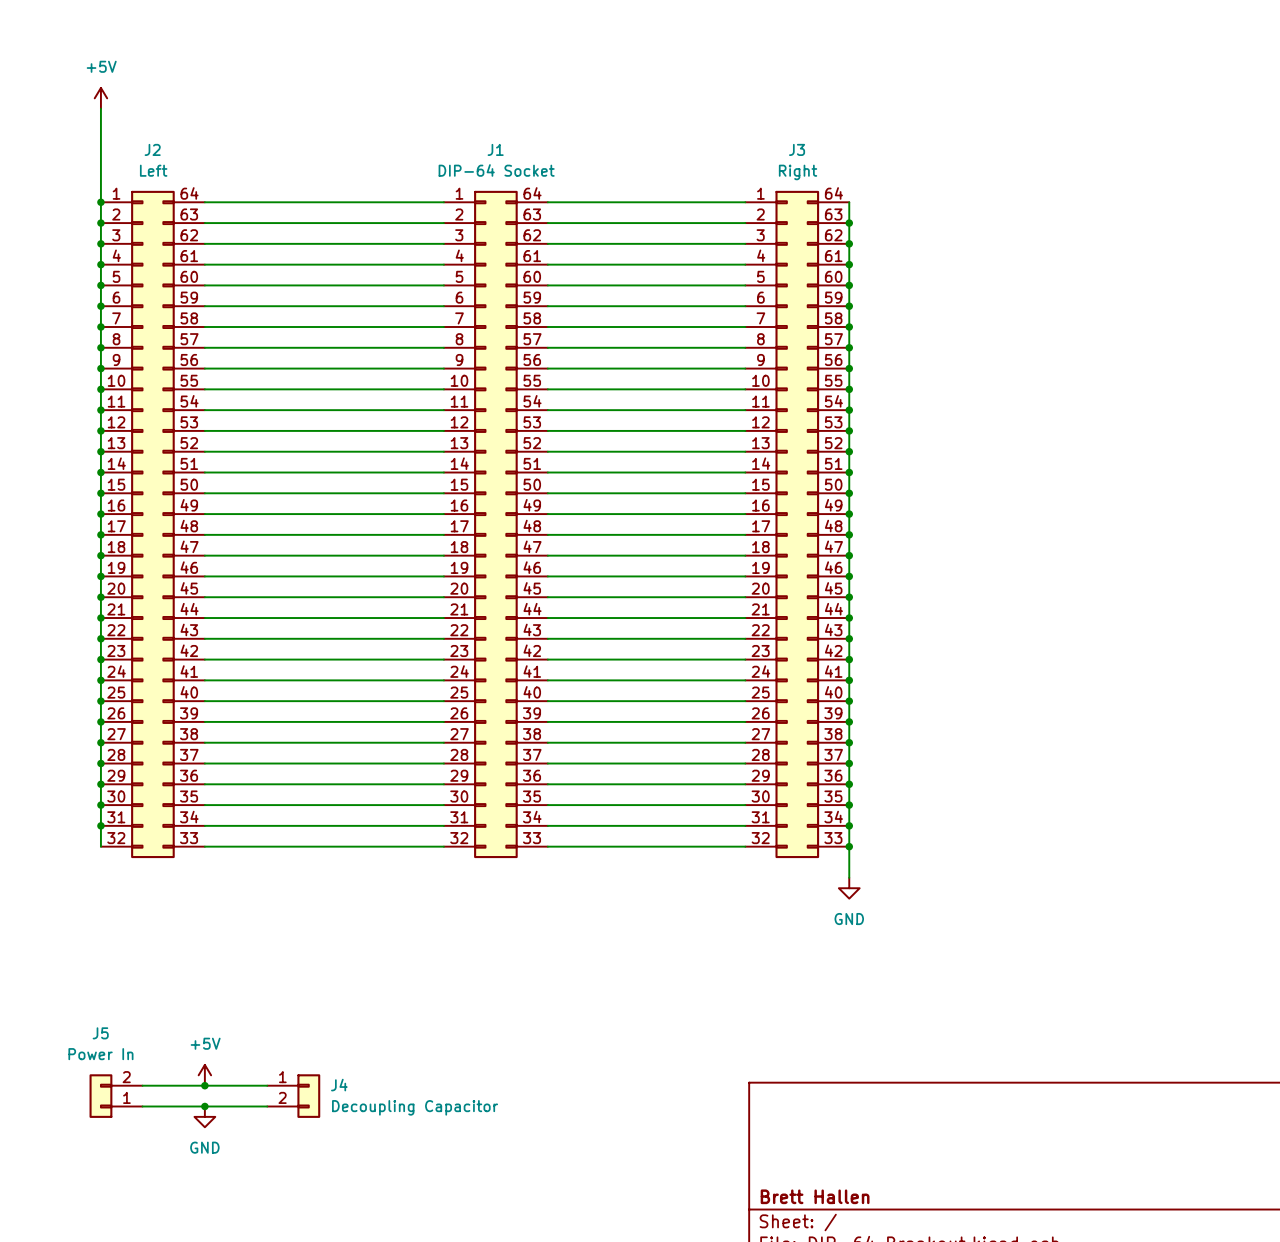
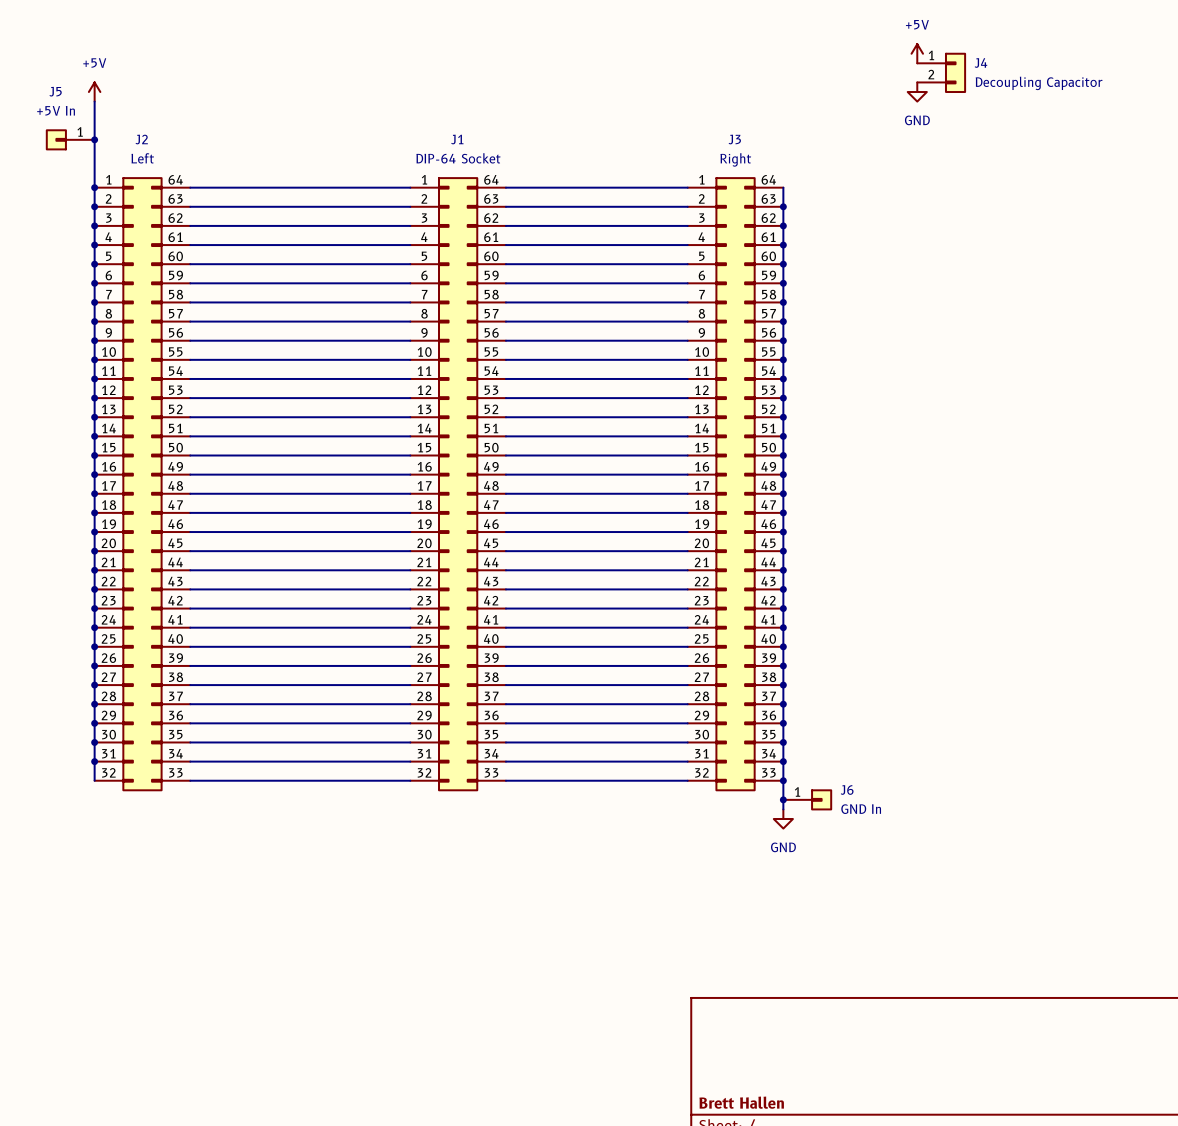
power symbol: none -> +5V (917, 53)
power symbol: none -> GND (917, 92)
junction: none -> (94, 139)
junction: none -> (783, 799)
J6: none -> GND In (807, 799)
J5 value: Power In (100, 1054) -> +5V In (56, 110)
J5 symbol: [89, 1074, 143, 1118] -> [45, 129, 95, 151]
power symbol: +5V (204, 1075) -> none
wire: (142, 1085) (267, 1085) -> none
junction: (204, 1085) -> none
J4 position: (293, 1096) -> (941, 72)
wire: (142, 1106) (267, 1106) -> none
junction: (204, 1106) -> none
power symbol: GND (204, 1116) -> none

